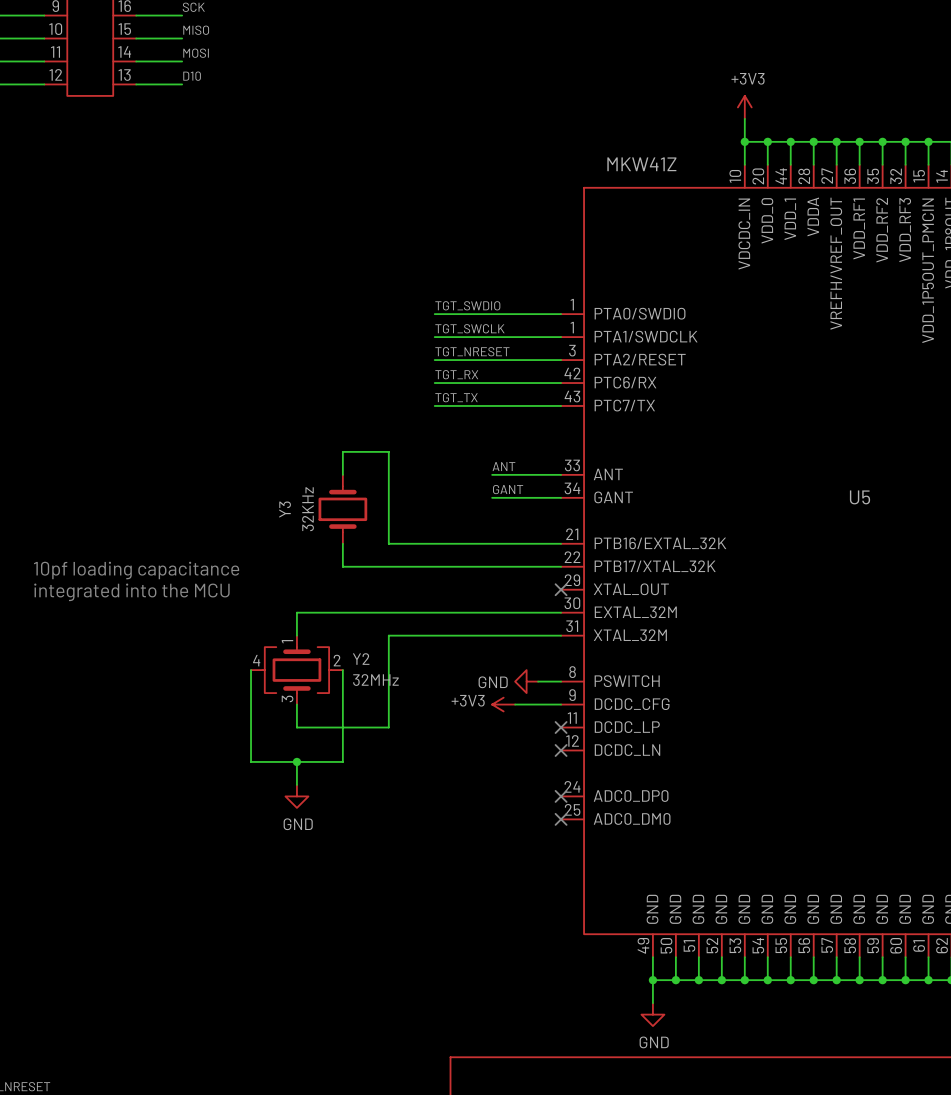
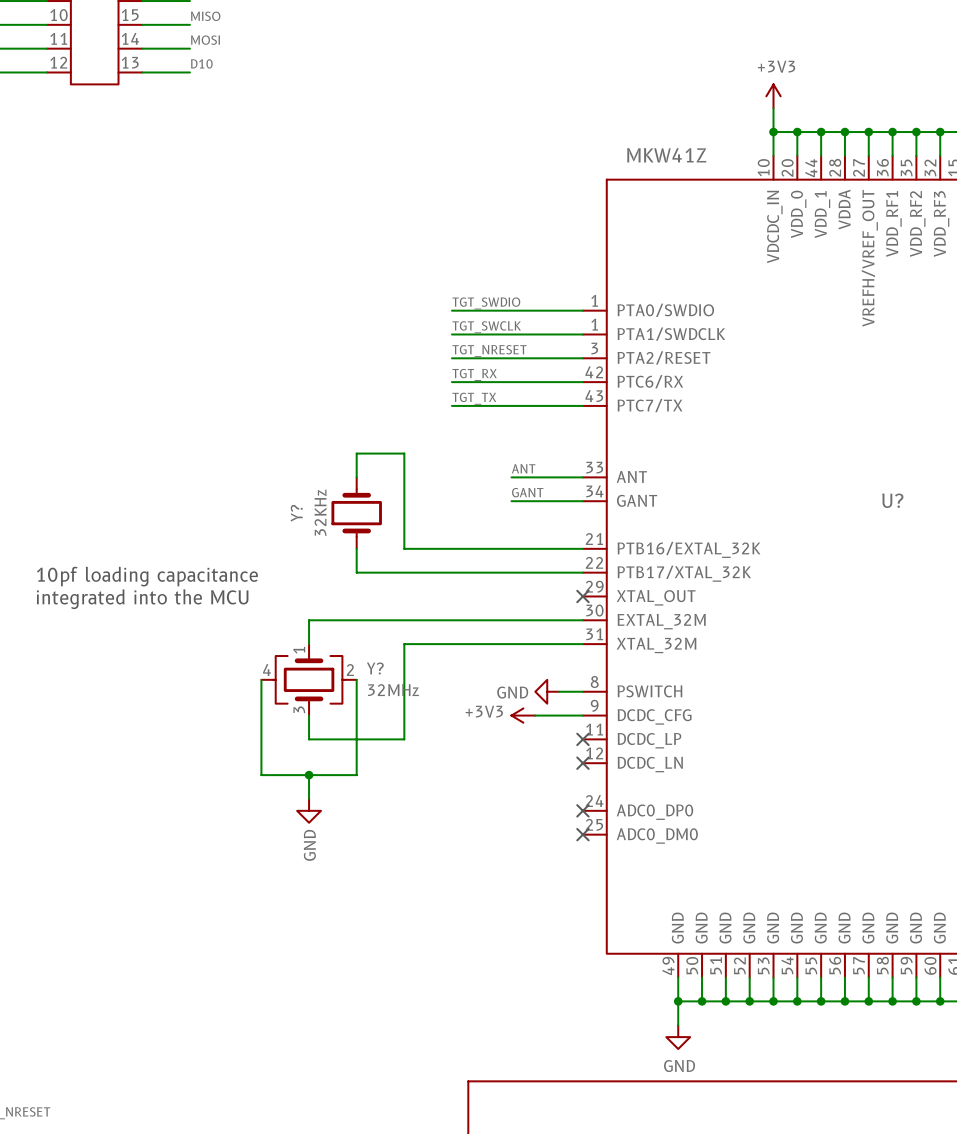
U5 name: U5 (860, 497) -> U? (892, 500)
Y3 name: Y3 (285, 509) -> Y? (296, 513)
Y2 name: Y2 (361, 659) -> Y? (375, 668)
power symbol text rotation: 0° (298, 824) -> 90° counterclockwise (309, 845)

